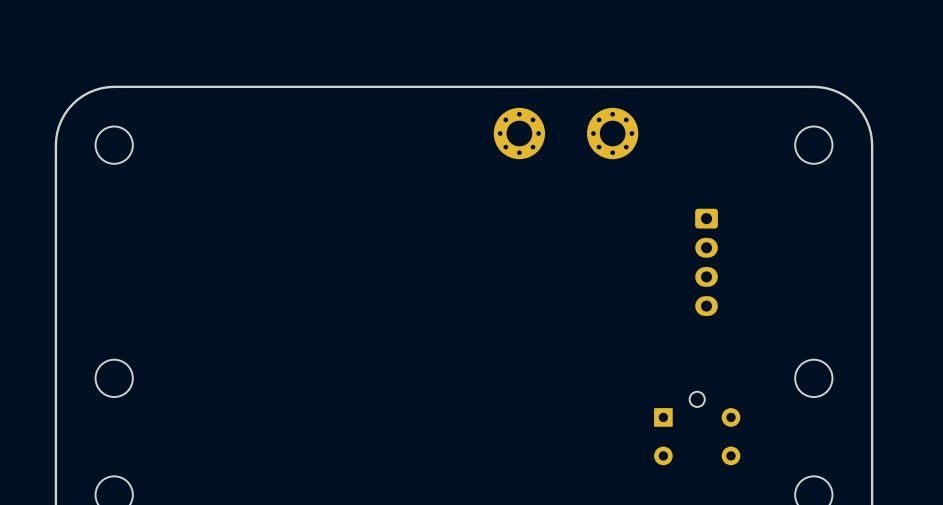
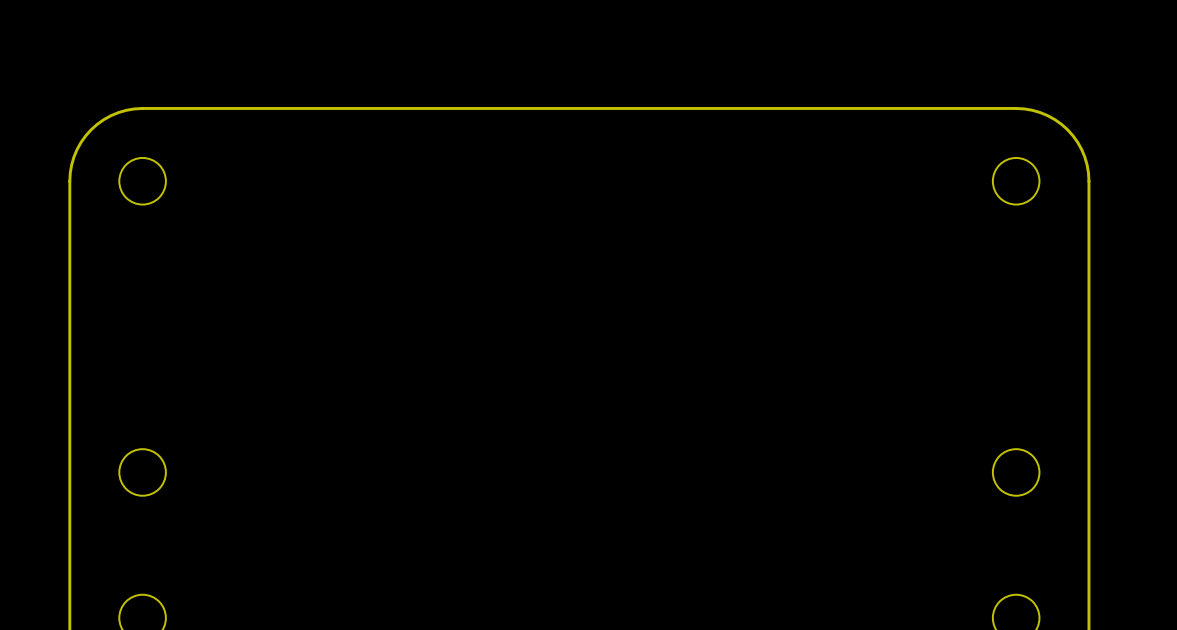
part: (519, 133) -> none
part: (612, 133) -> none
part: (706, 262) -> none
part: (697, 428) -> none

